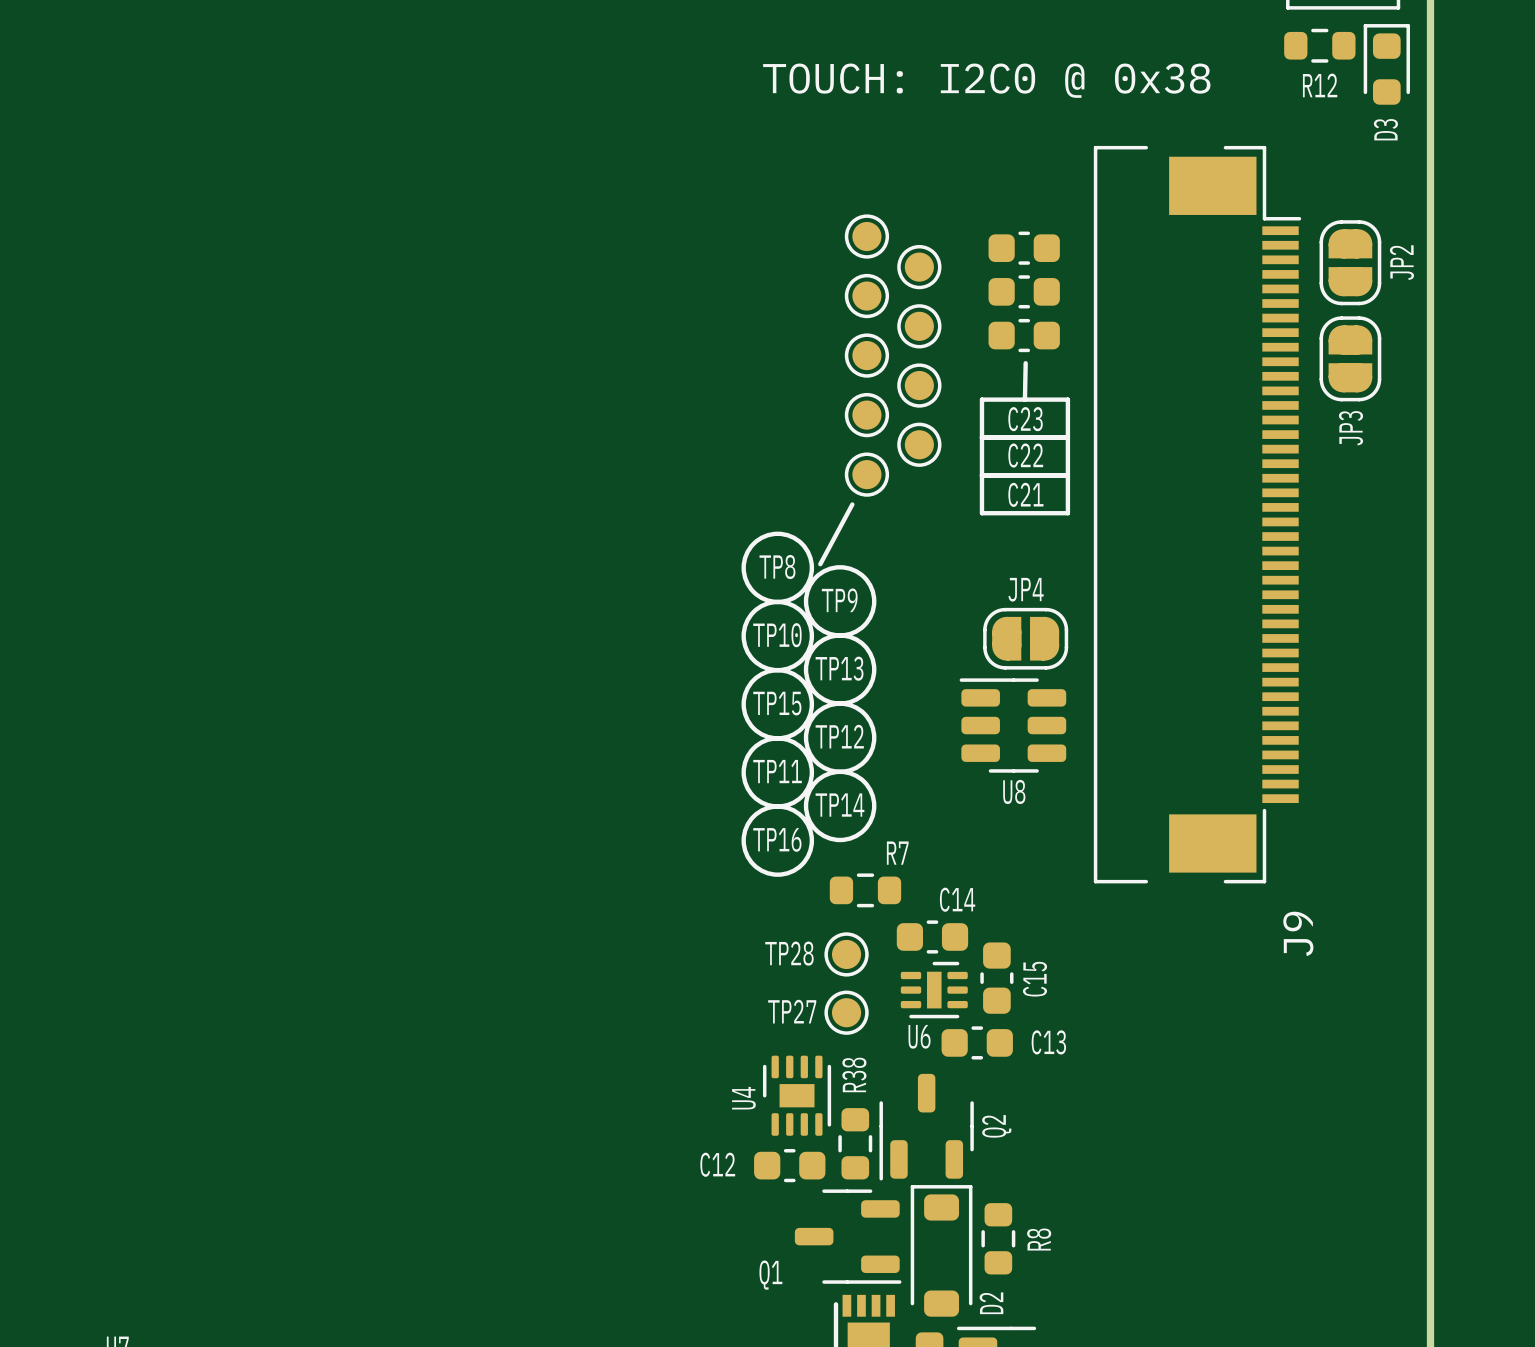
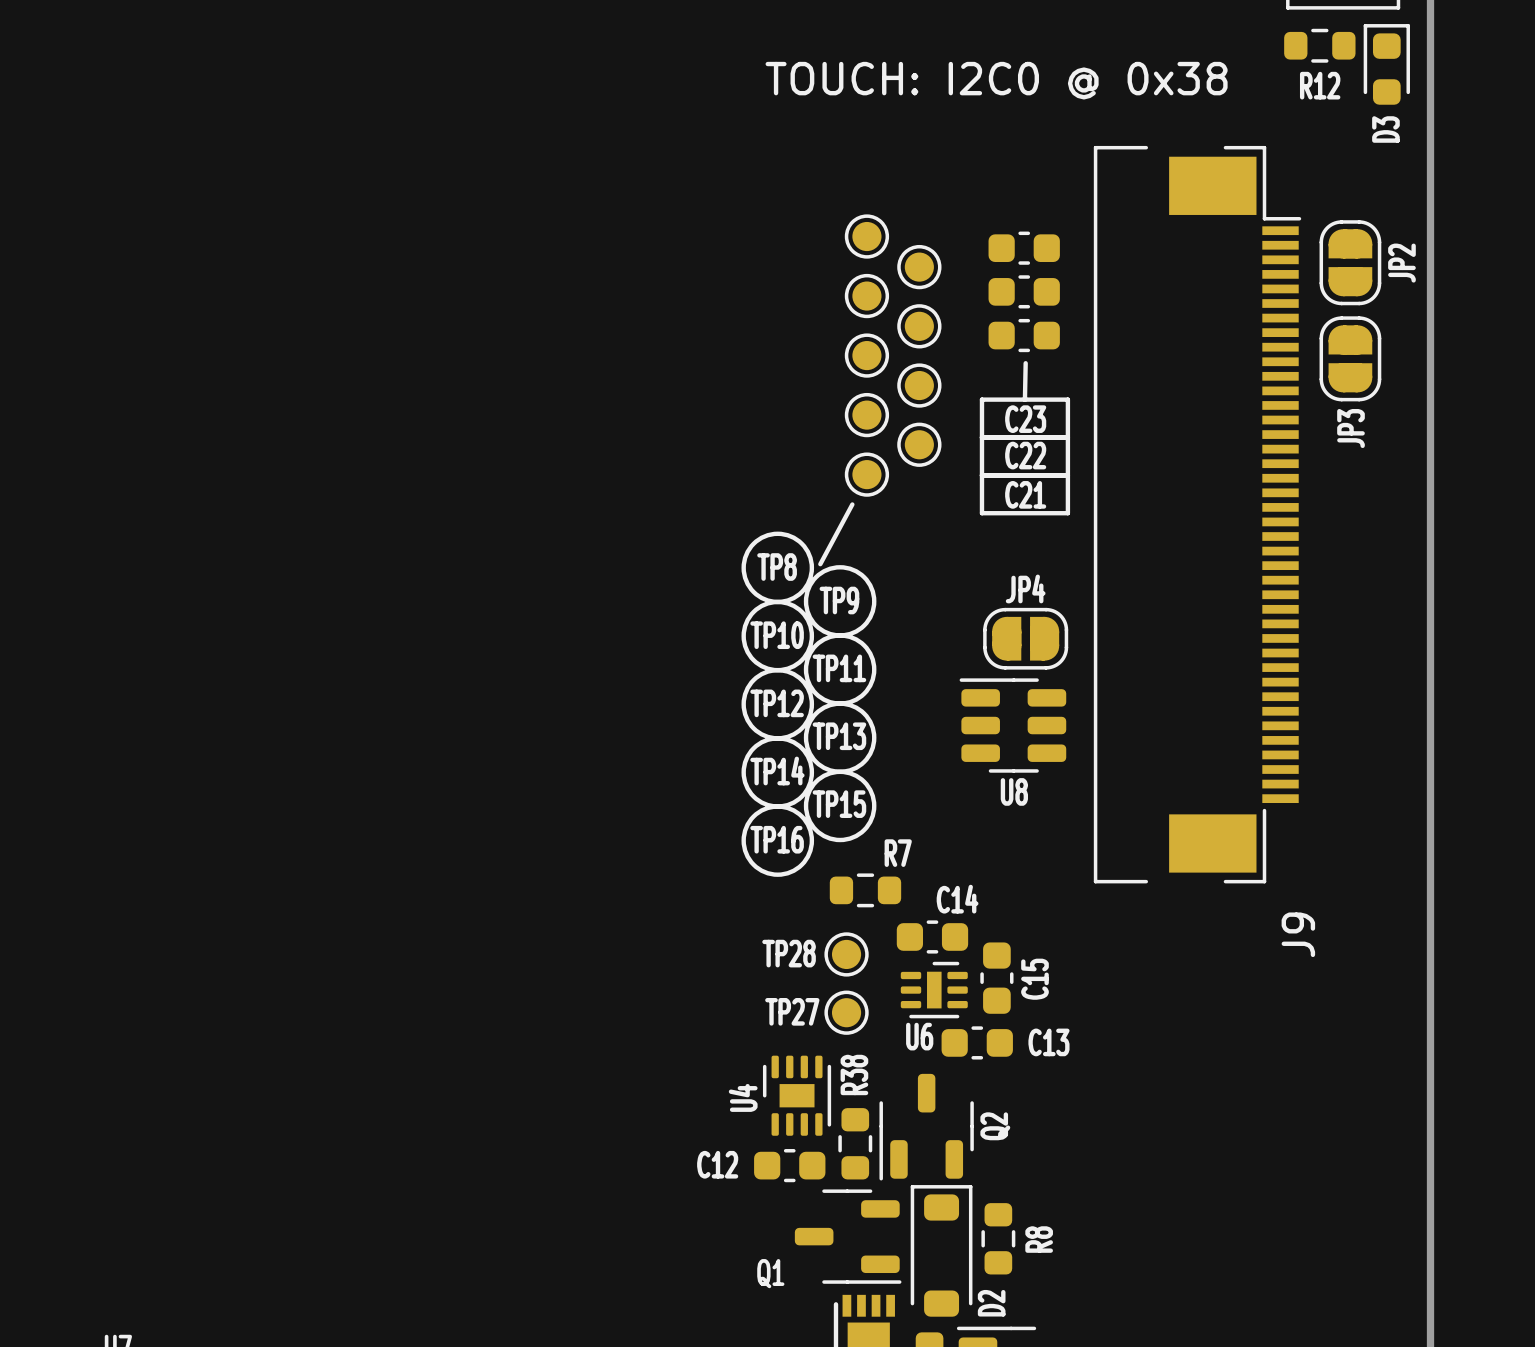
TP13 name: TP13 (839, 668) -> TP11 (839, 668)
TP15 name: TP15 (777, 703) -> TP12 (777, 703)
TP12 name: TP12 (839, 736) -> TP13 (839, 736)
TP11 name: TP11 (777, 771) -> TP14 (777, 771)
TP14 name: TP14 (839, 805) -> TP15 (839, 804)

